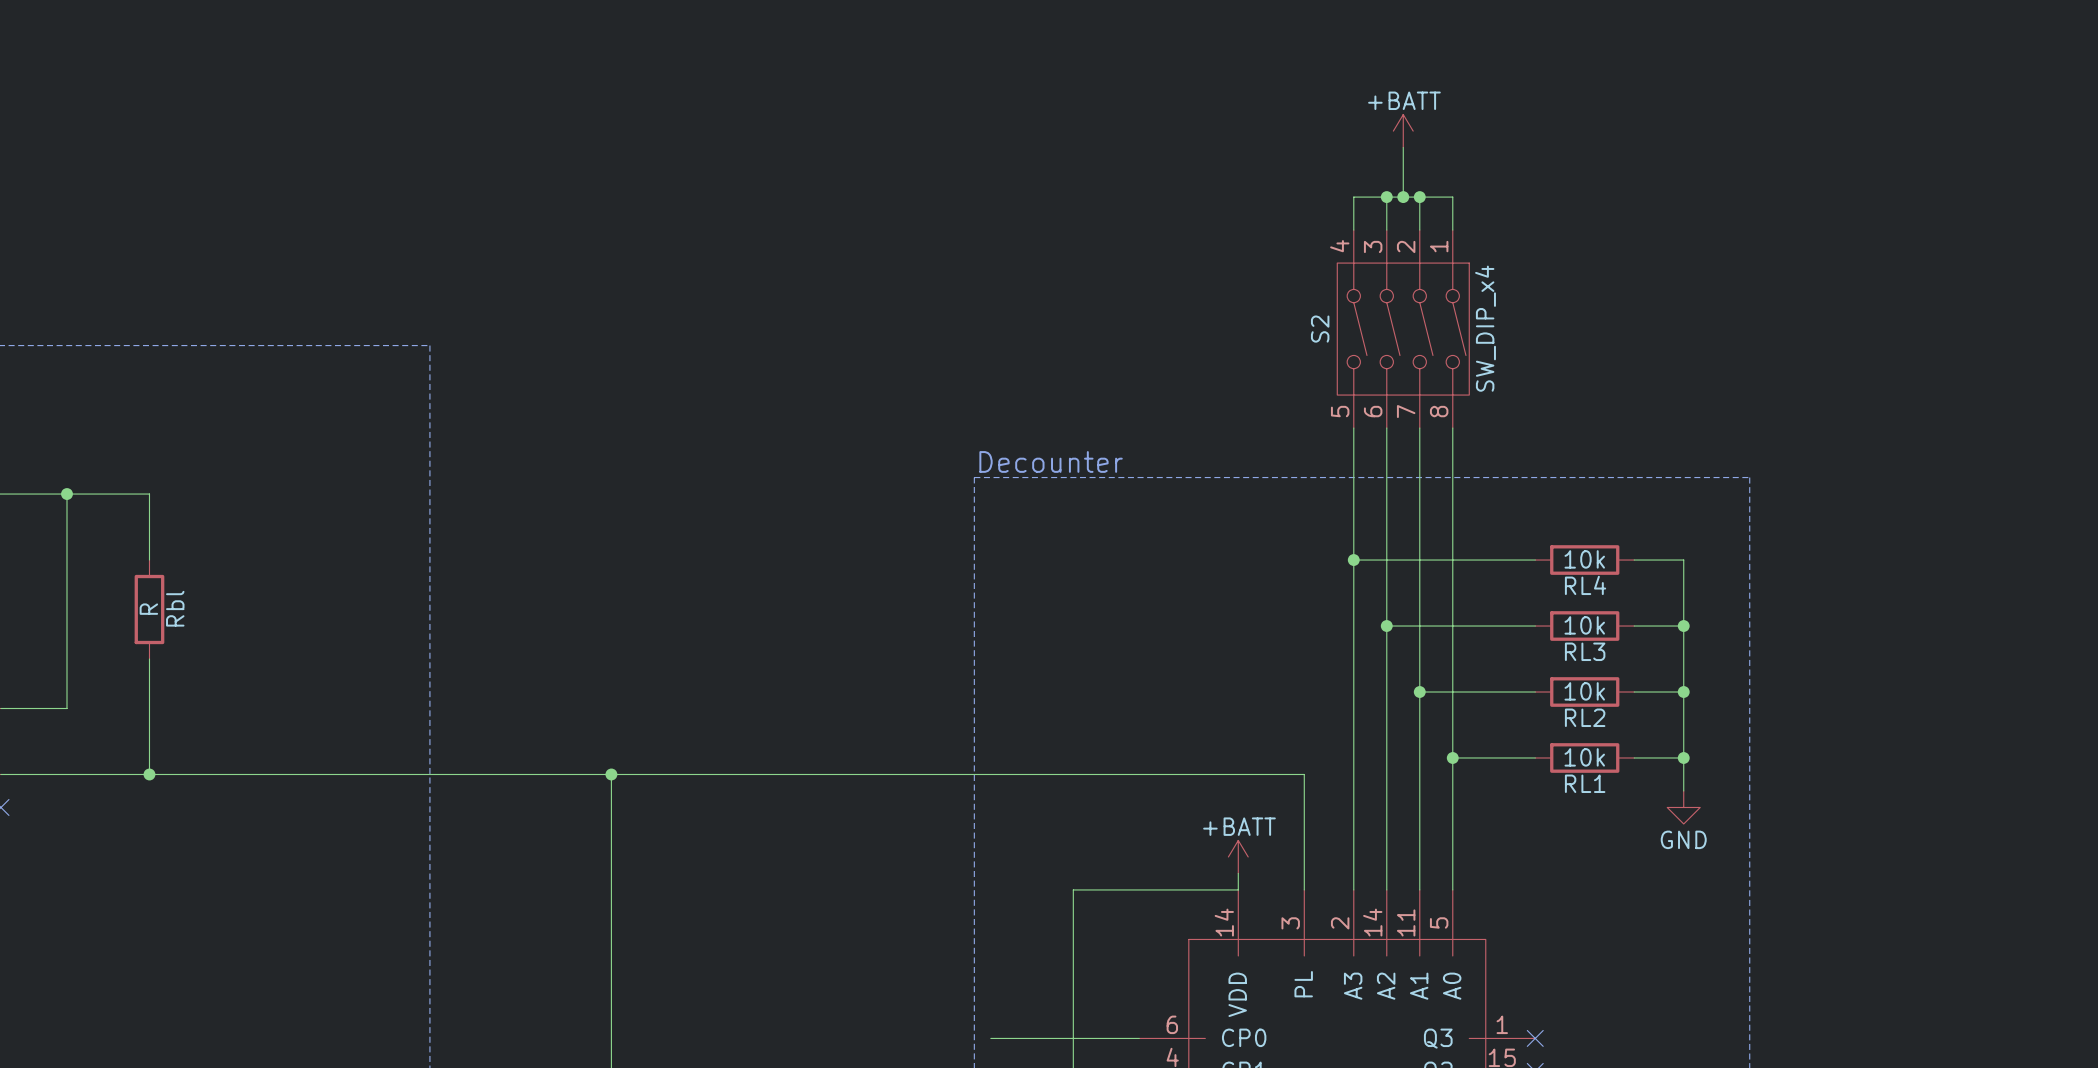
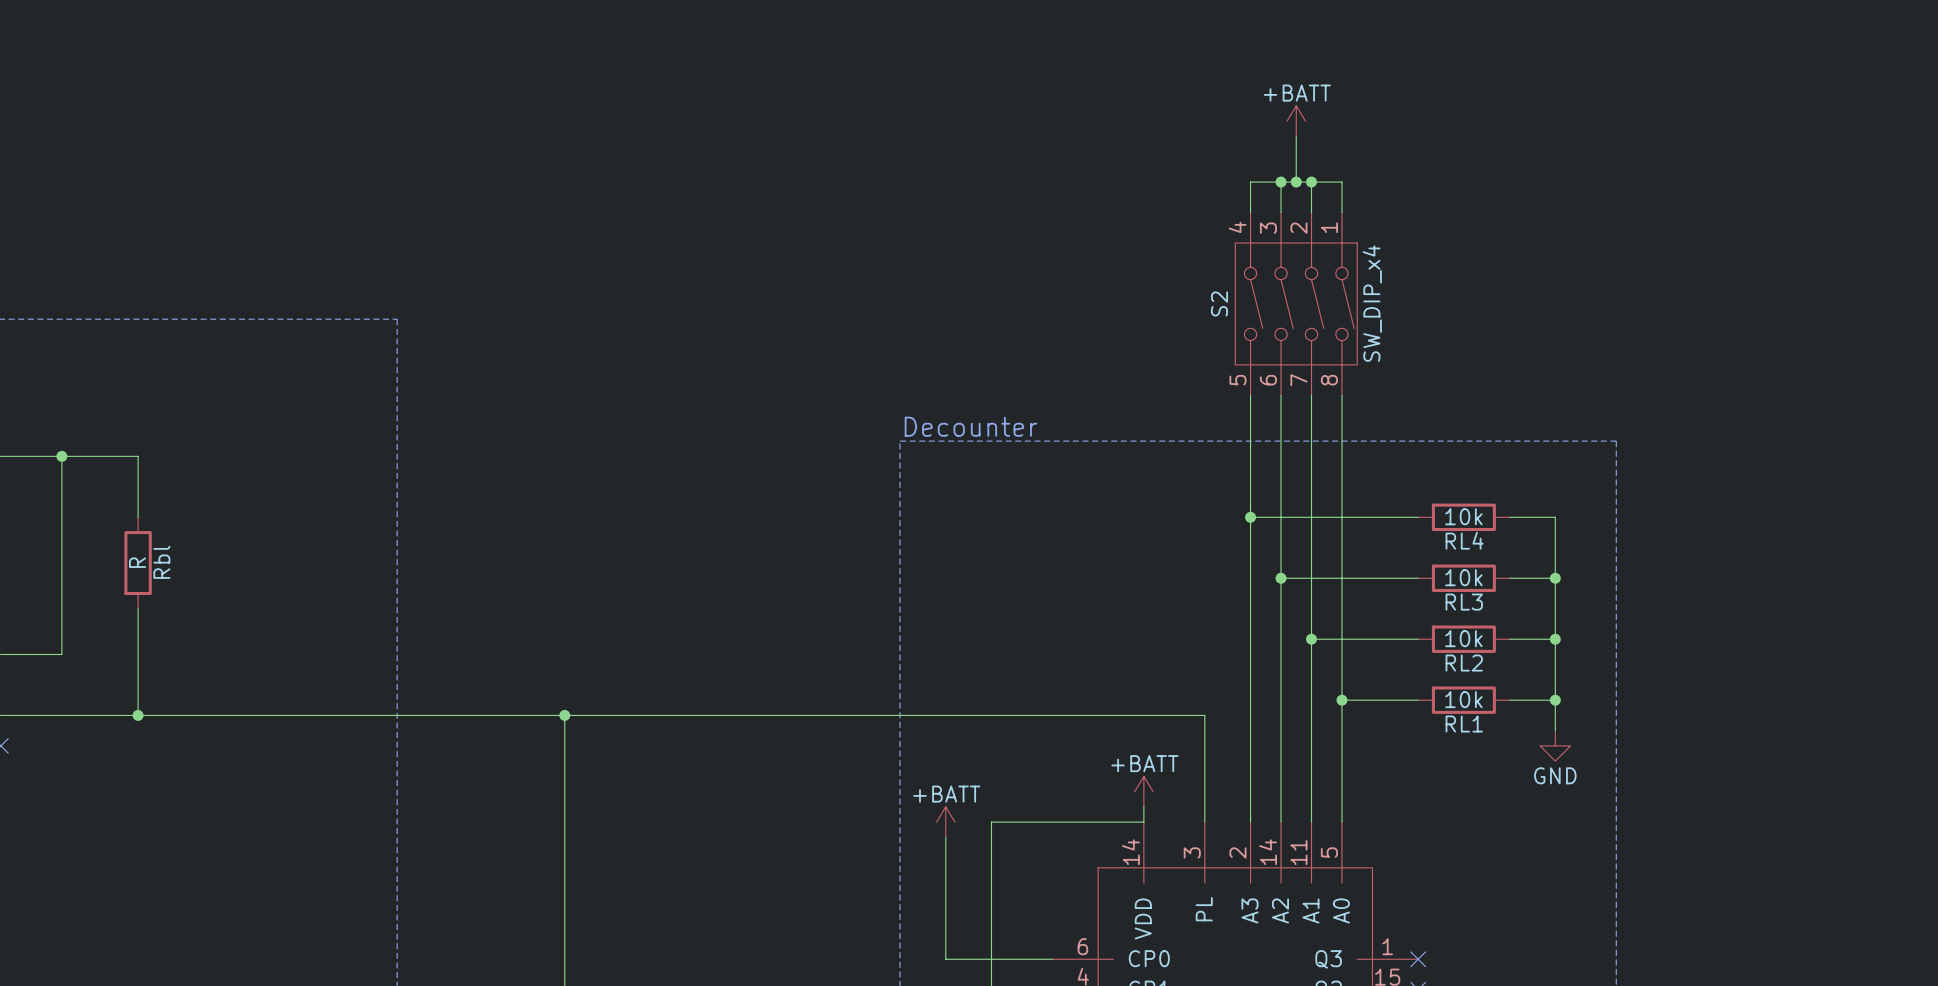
power symbol: none -> +BATT (945, 822)
wire: (990, 1038) (1023, 1038) -> (945, 837) (945, 959)

